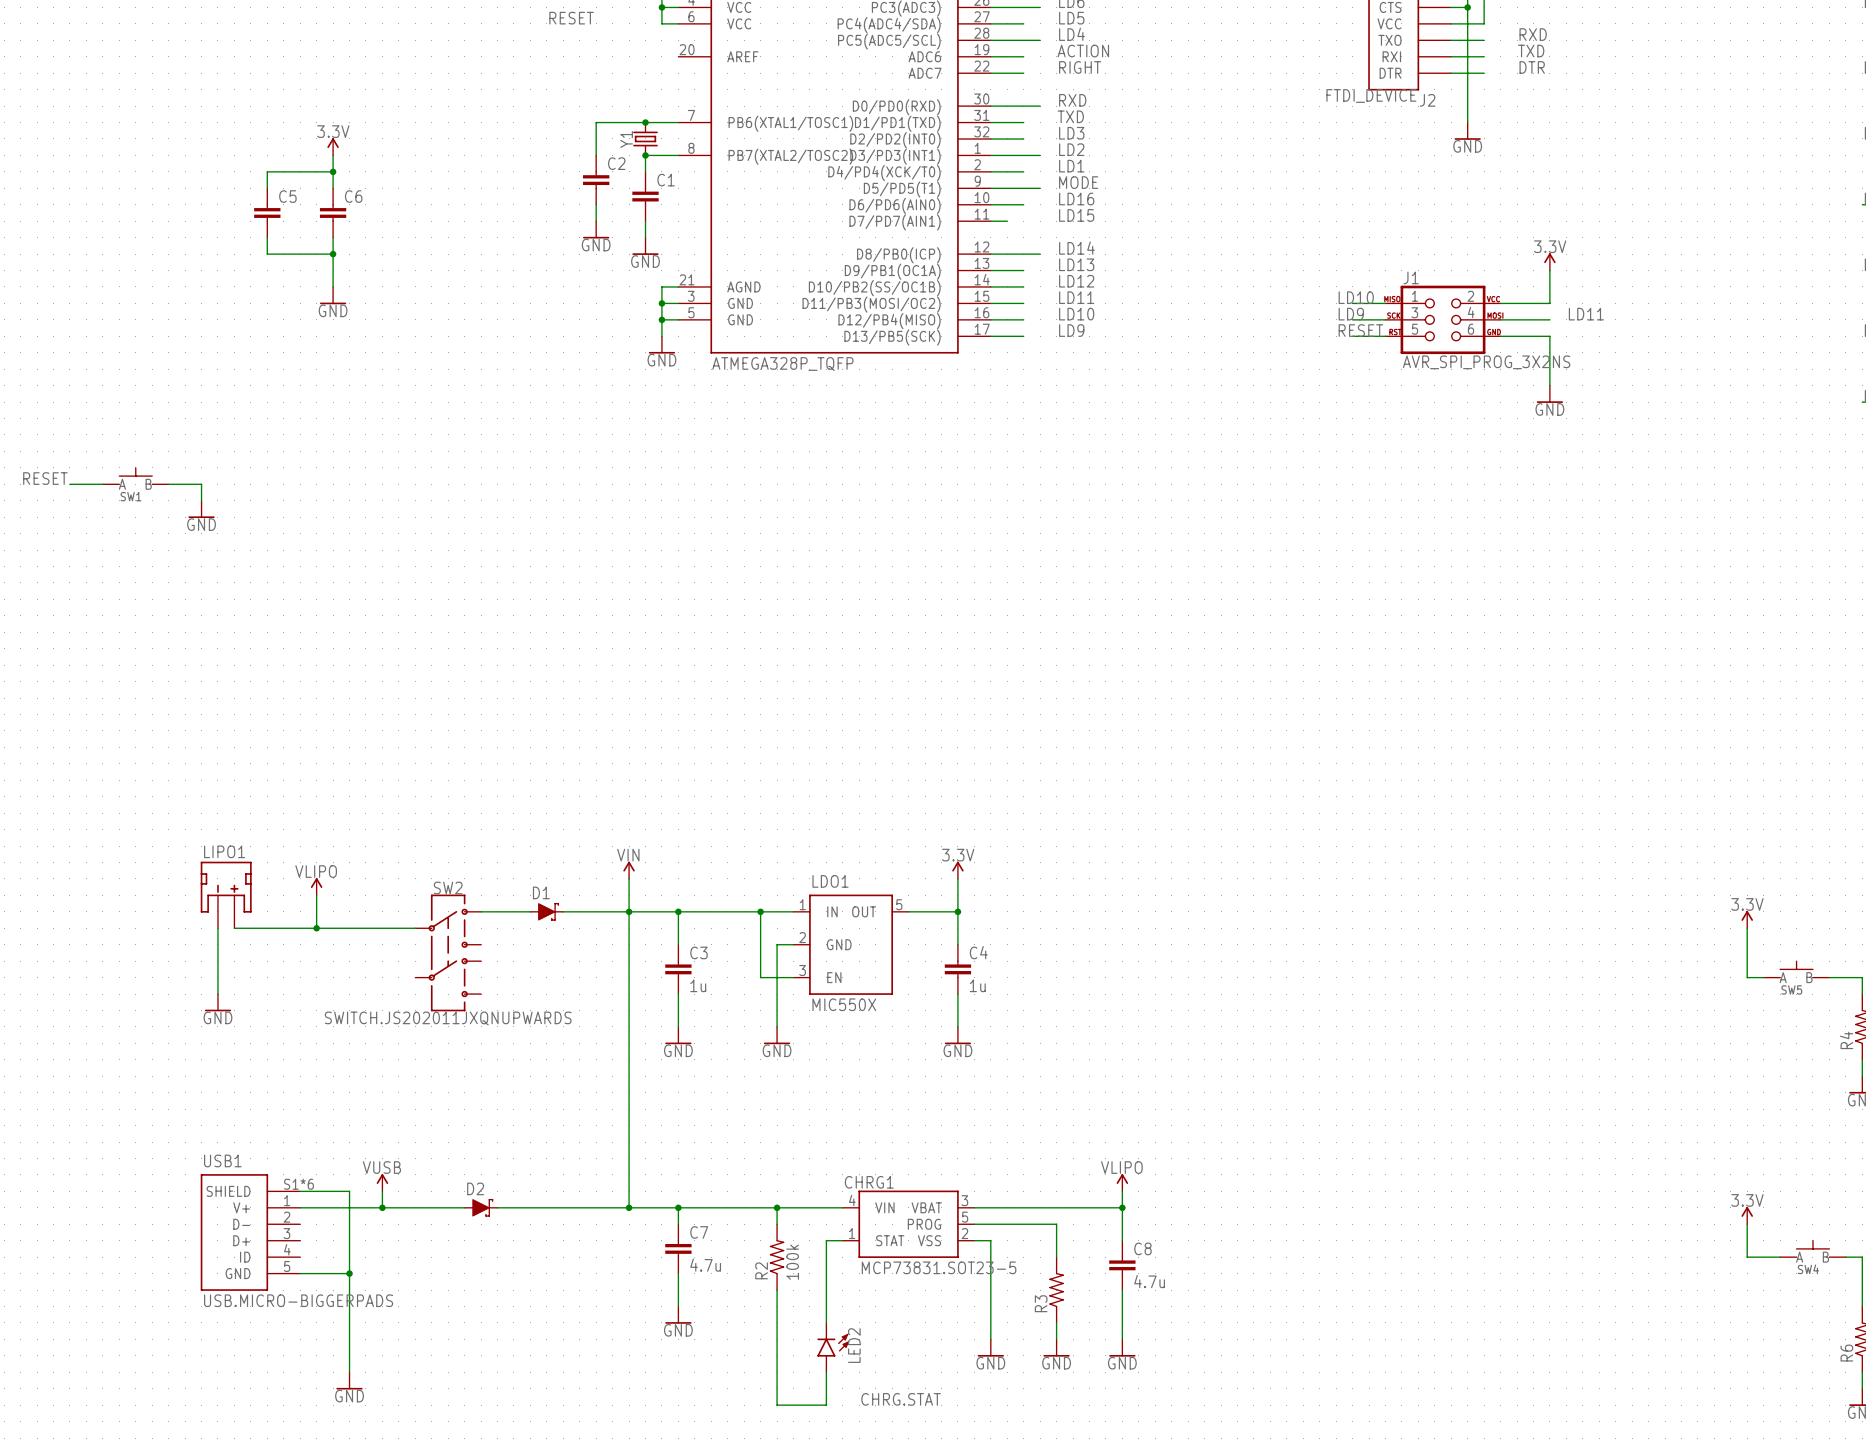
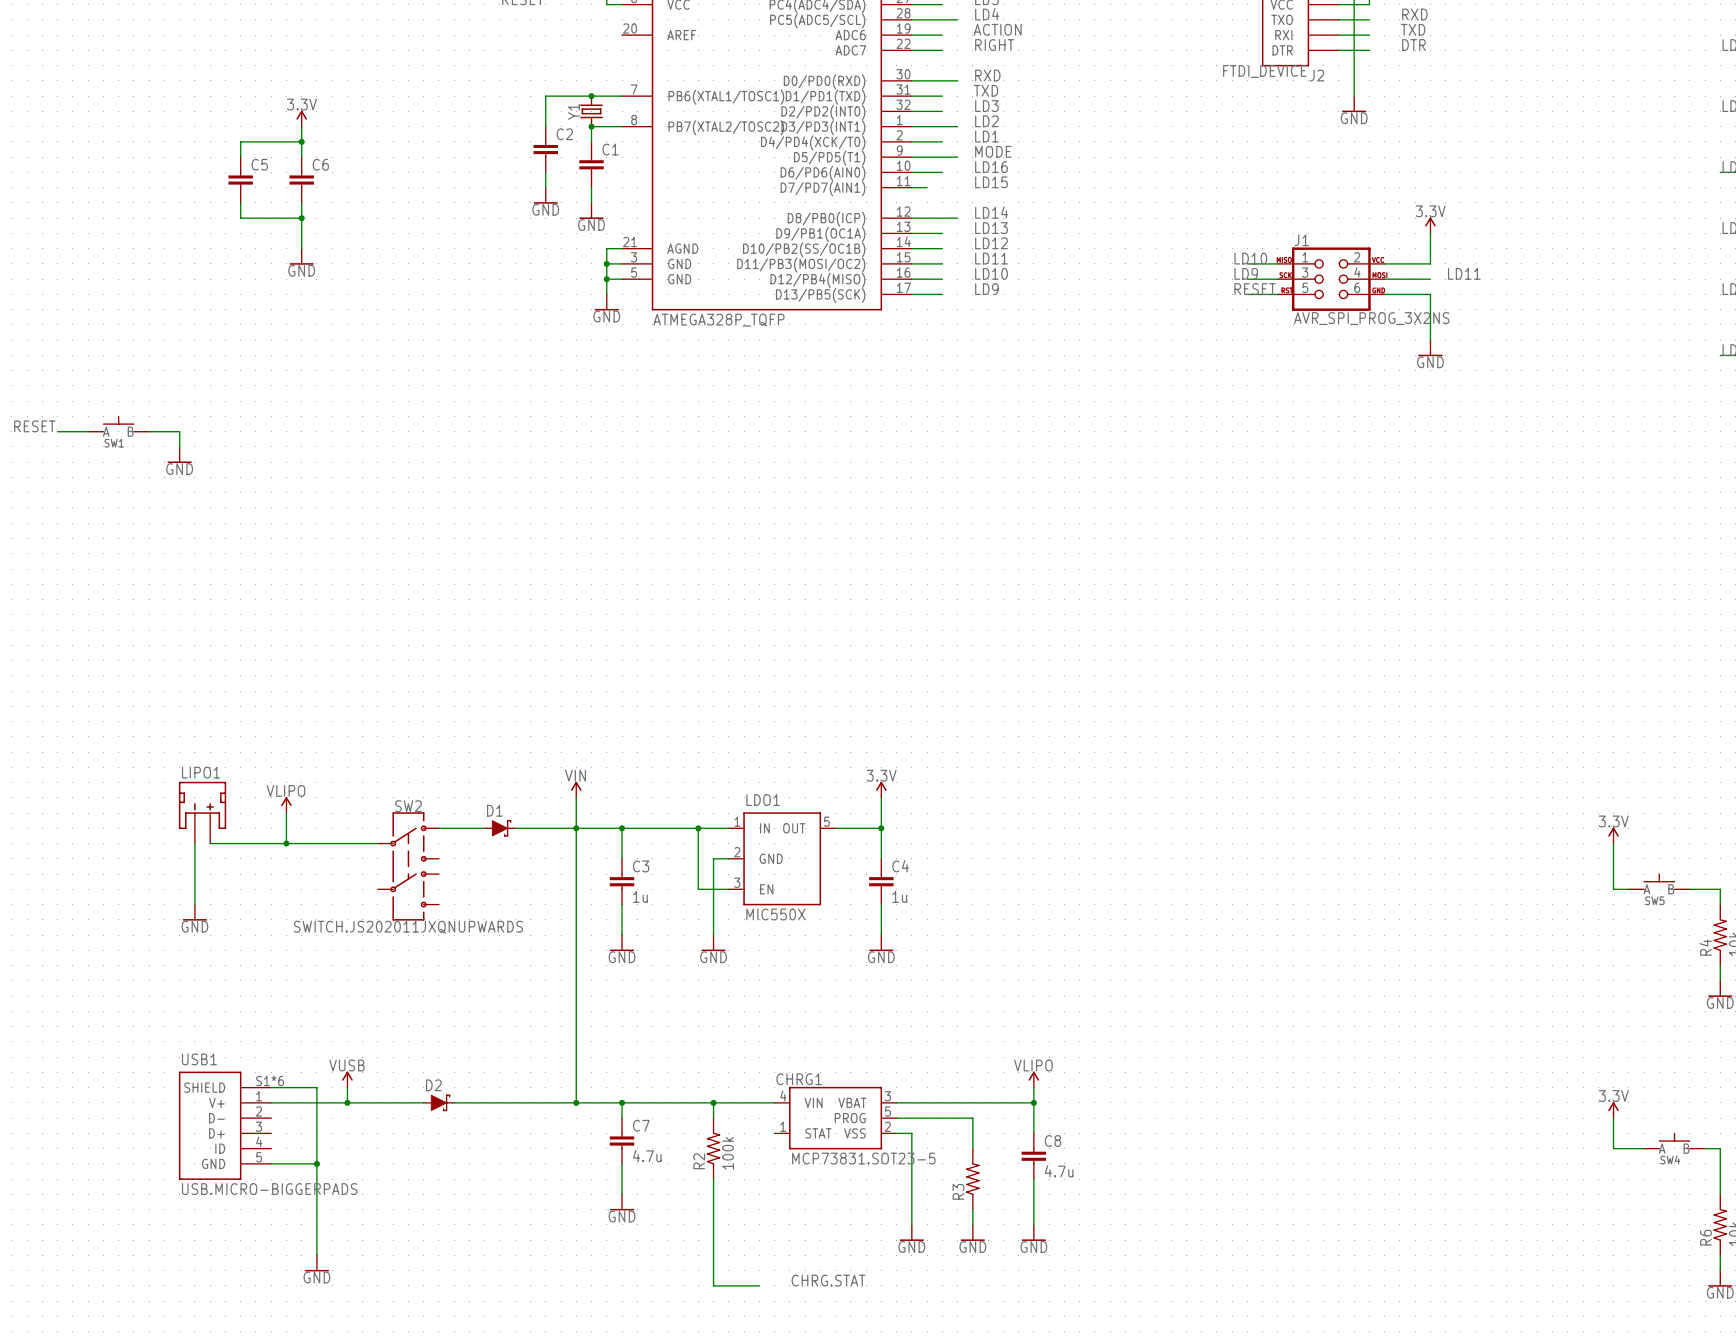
wire: (842, 1240) (826, 1240) (826, 1322) -> none
LED2: (833, 1347) -> none
wire: (826, 1372) (826, 1405) -> none

